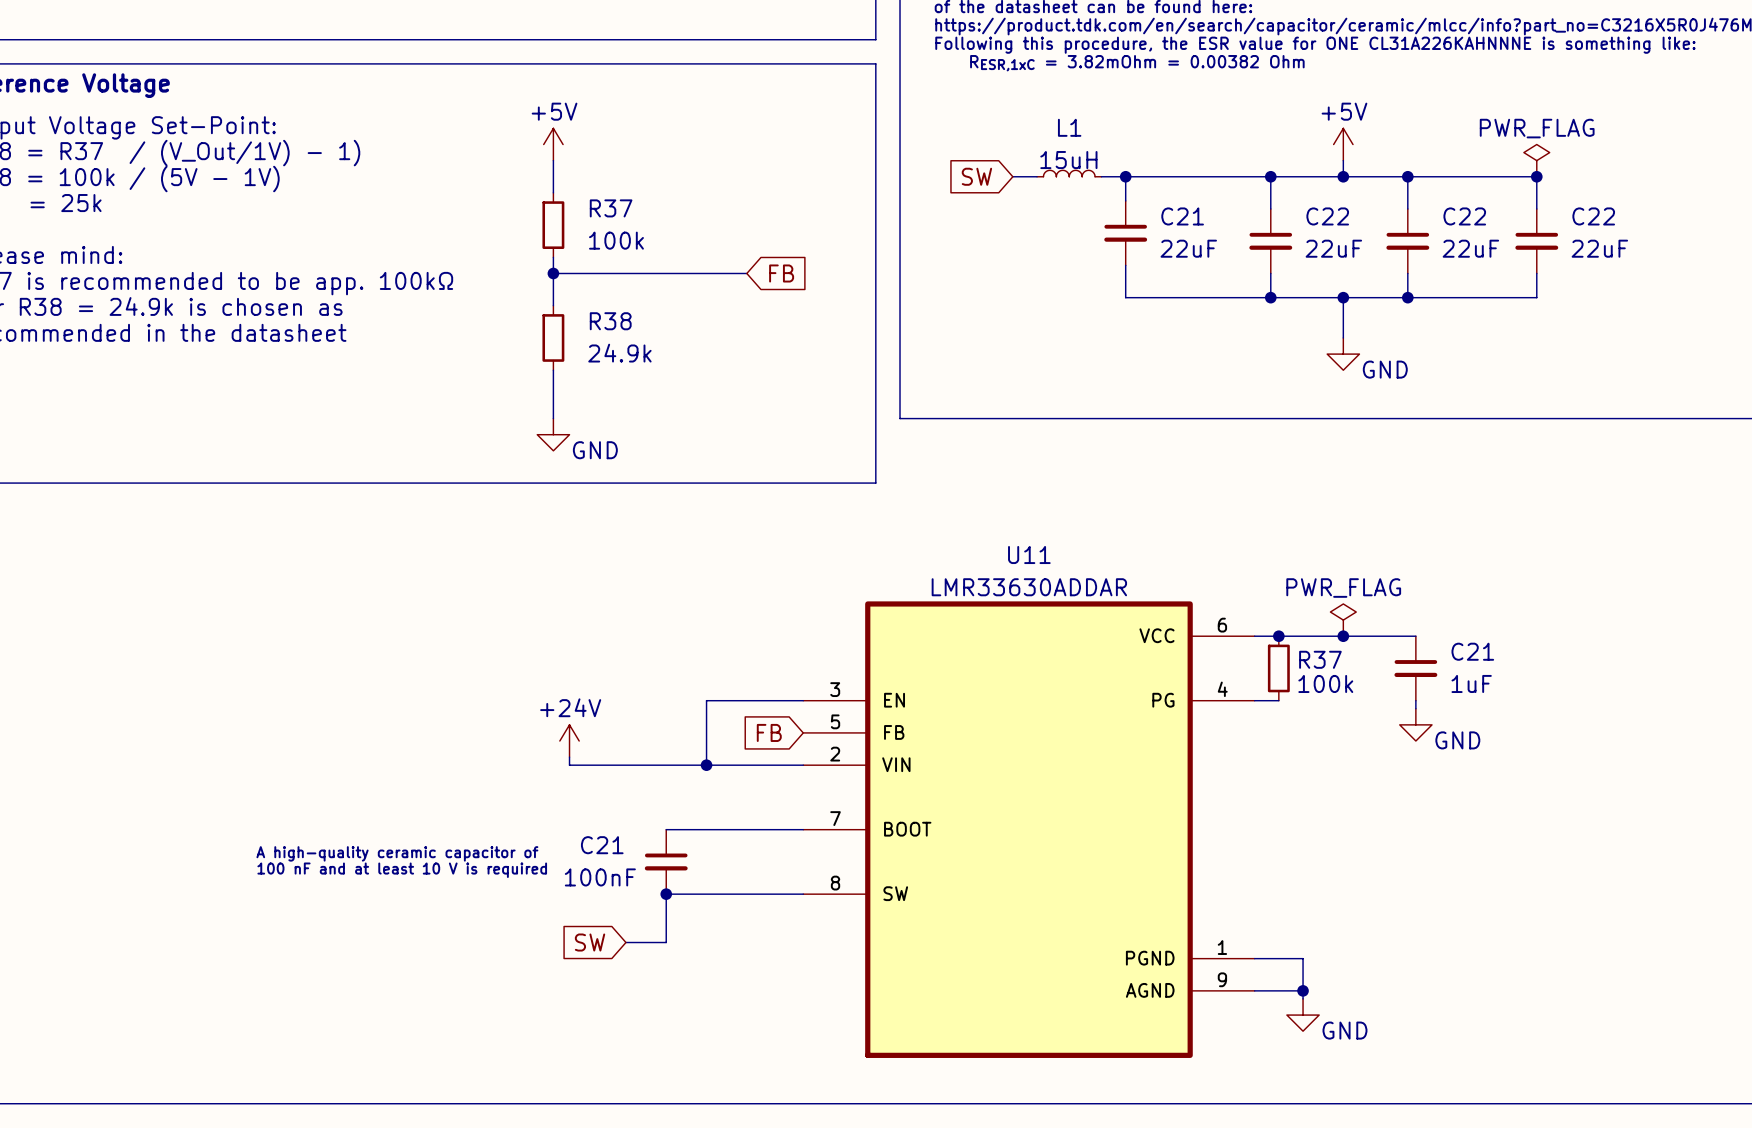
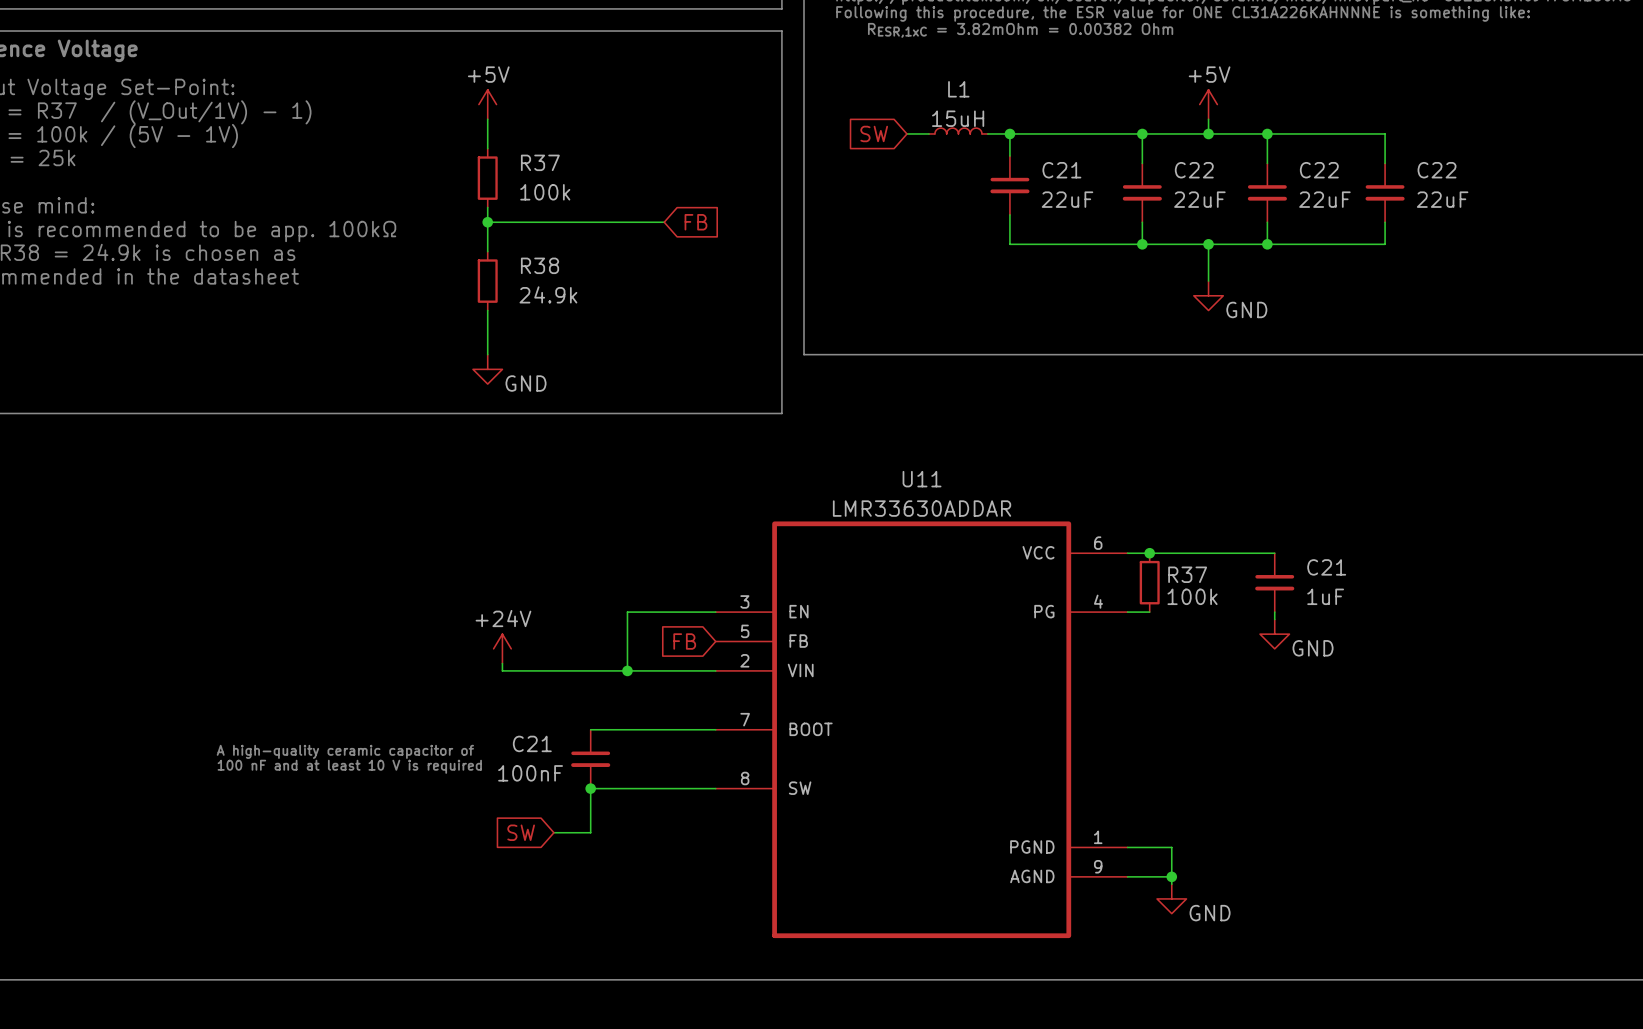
power symbol: PWR_FLAG (1536, 160) -> none
junction: (1536, 176) -> none
power symbol: PWR_FLAG (1343, 620) -> none
junction: (1343, 636) -> none

